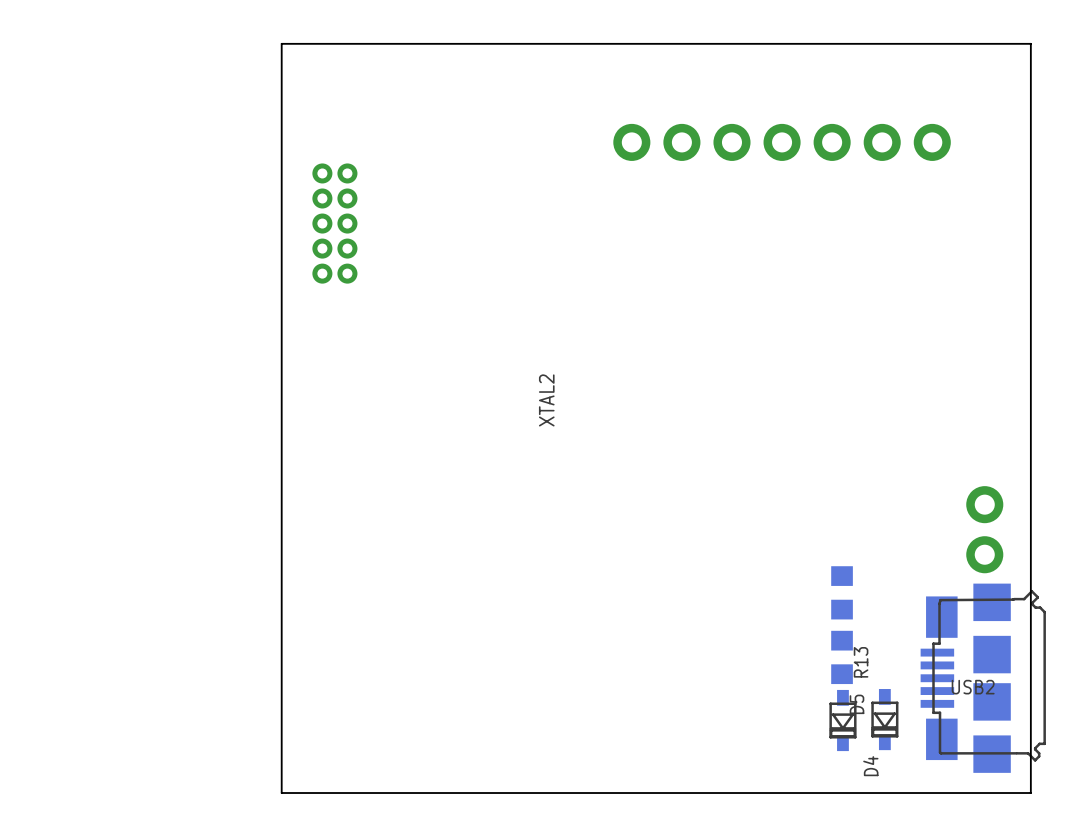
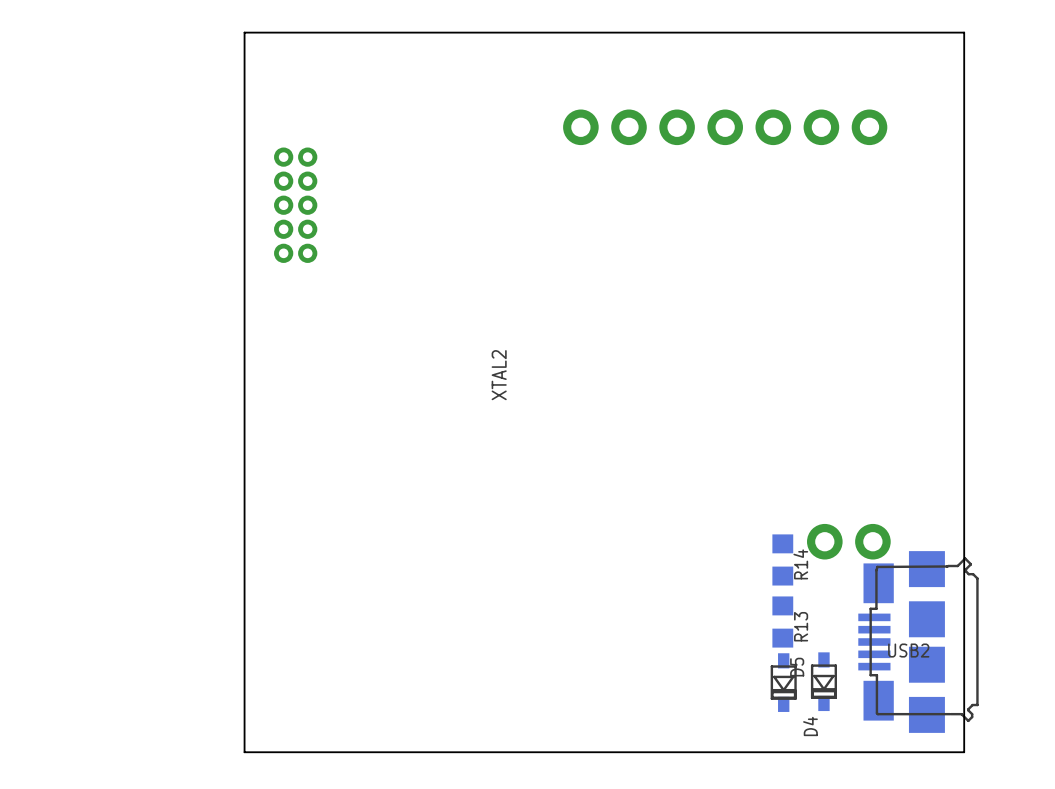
part rotation: 0° (984, 529) -> 90° clockwise (848, 541)
part position: (984, 529) -> (848, 541)
R14 name: none -> R14 (800, 564)

